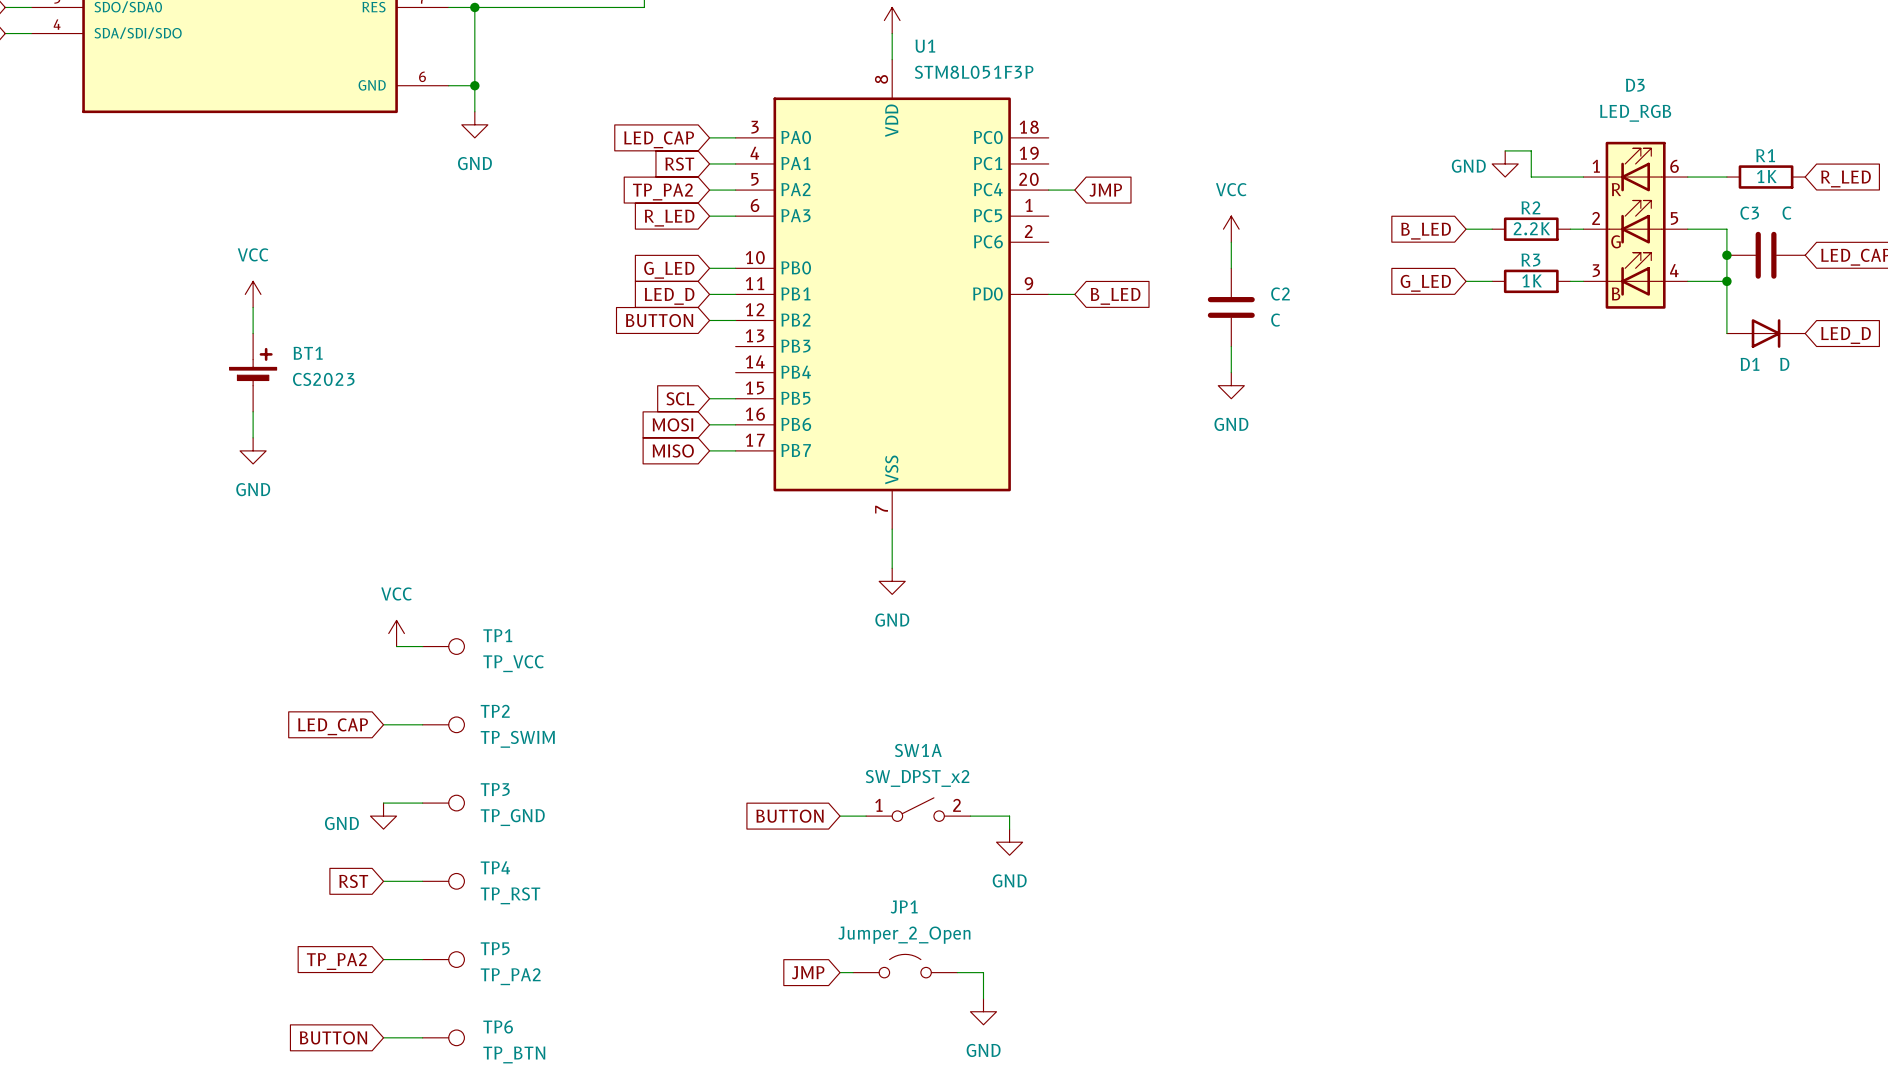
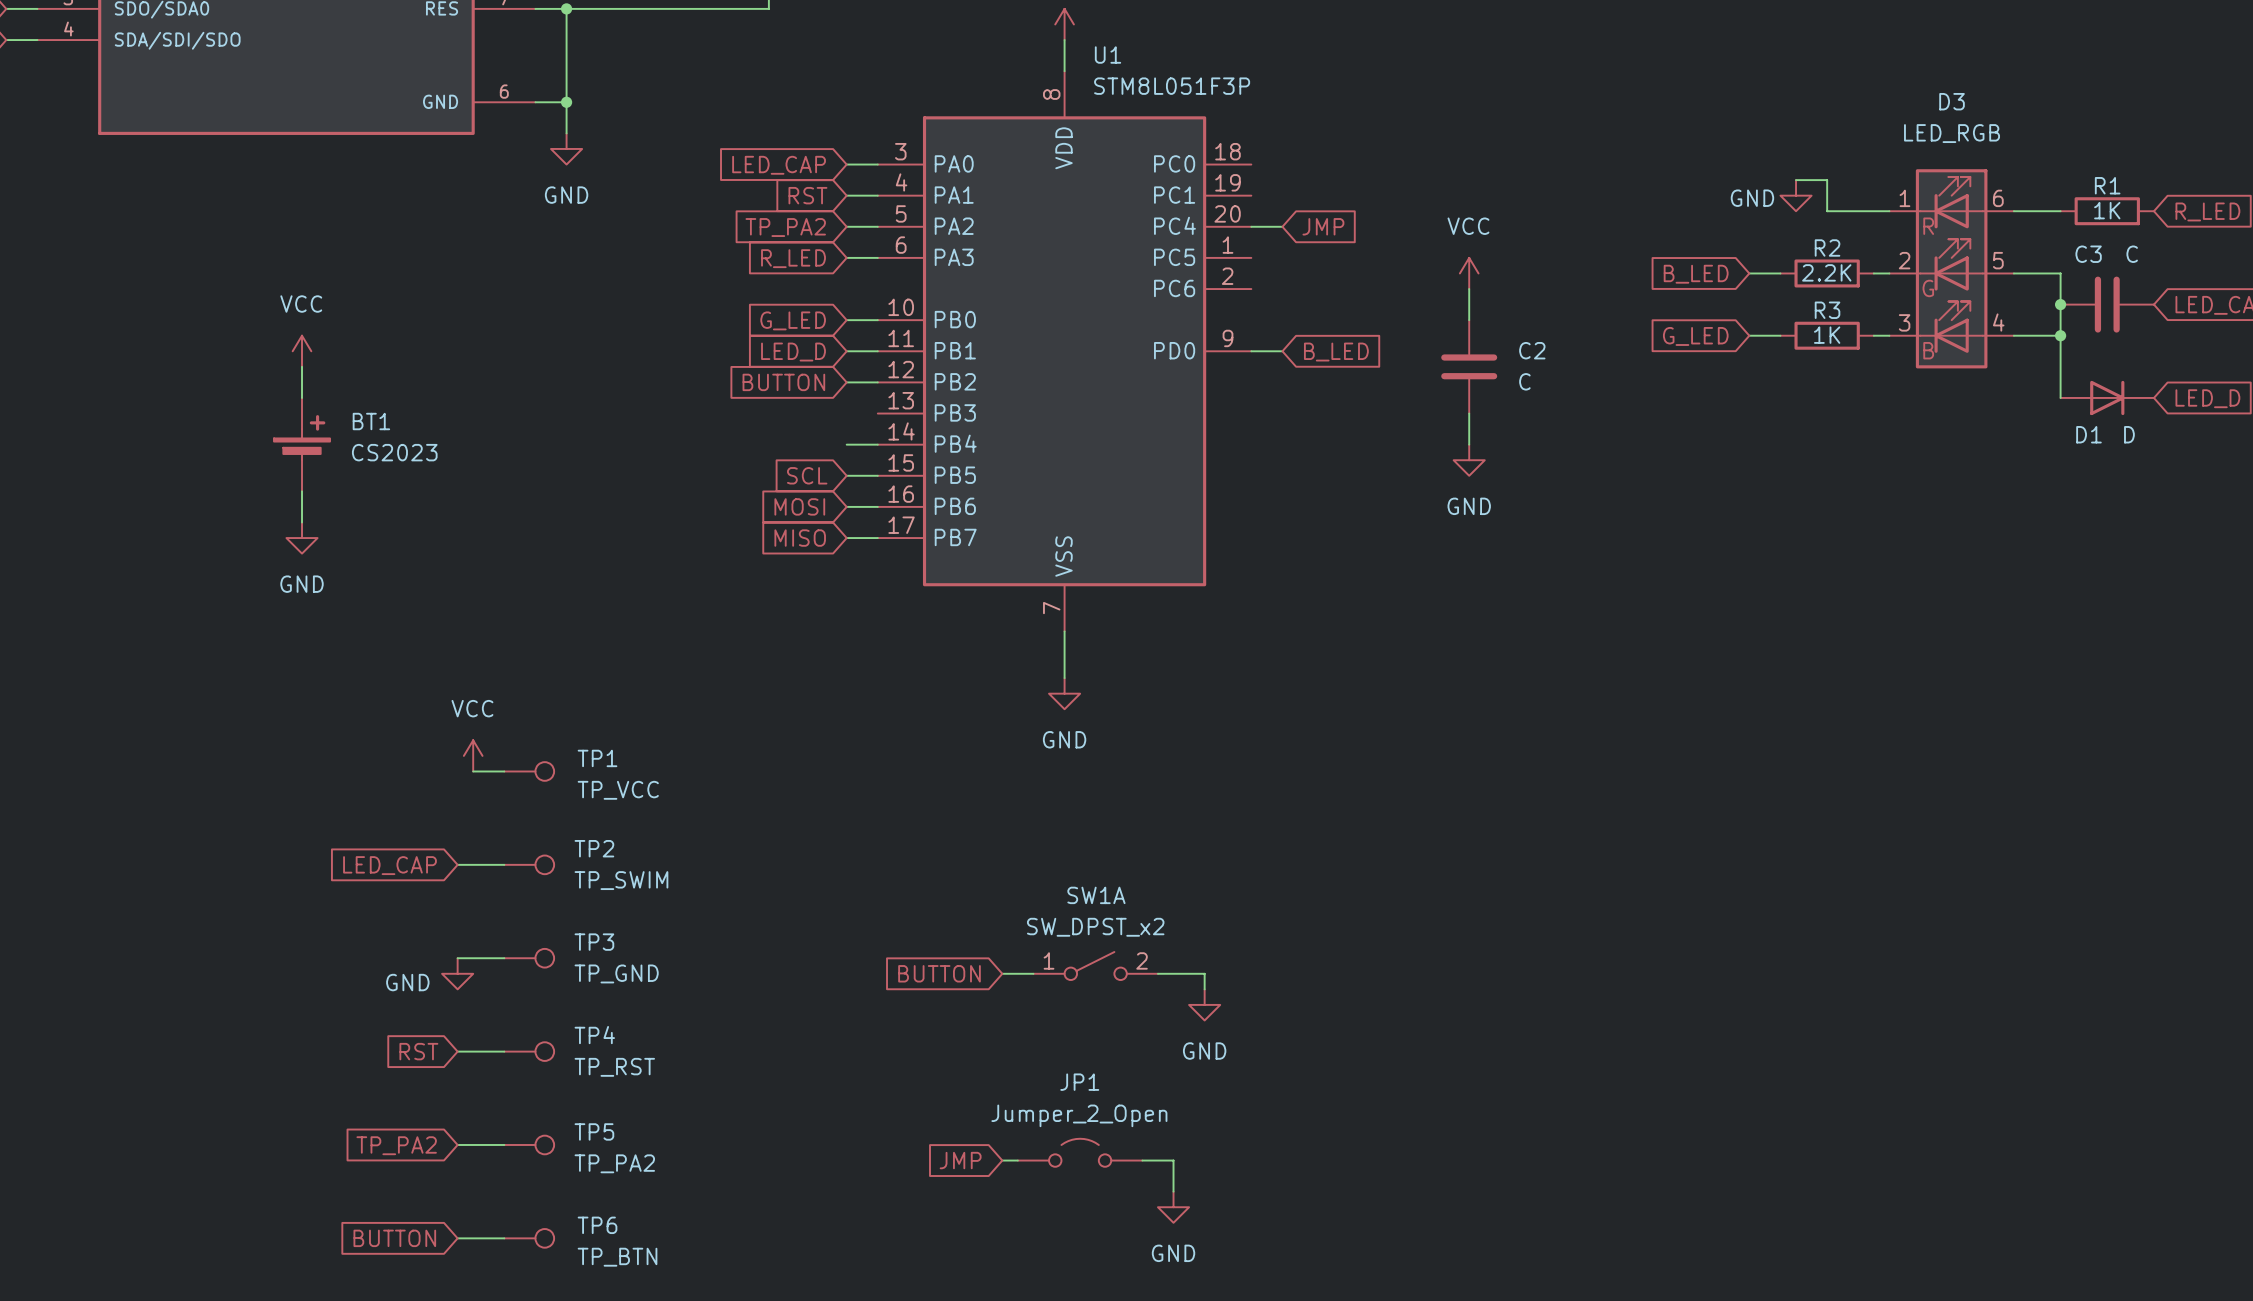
wire: none -> (846, 444) (877, 444)

